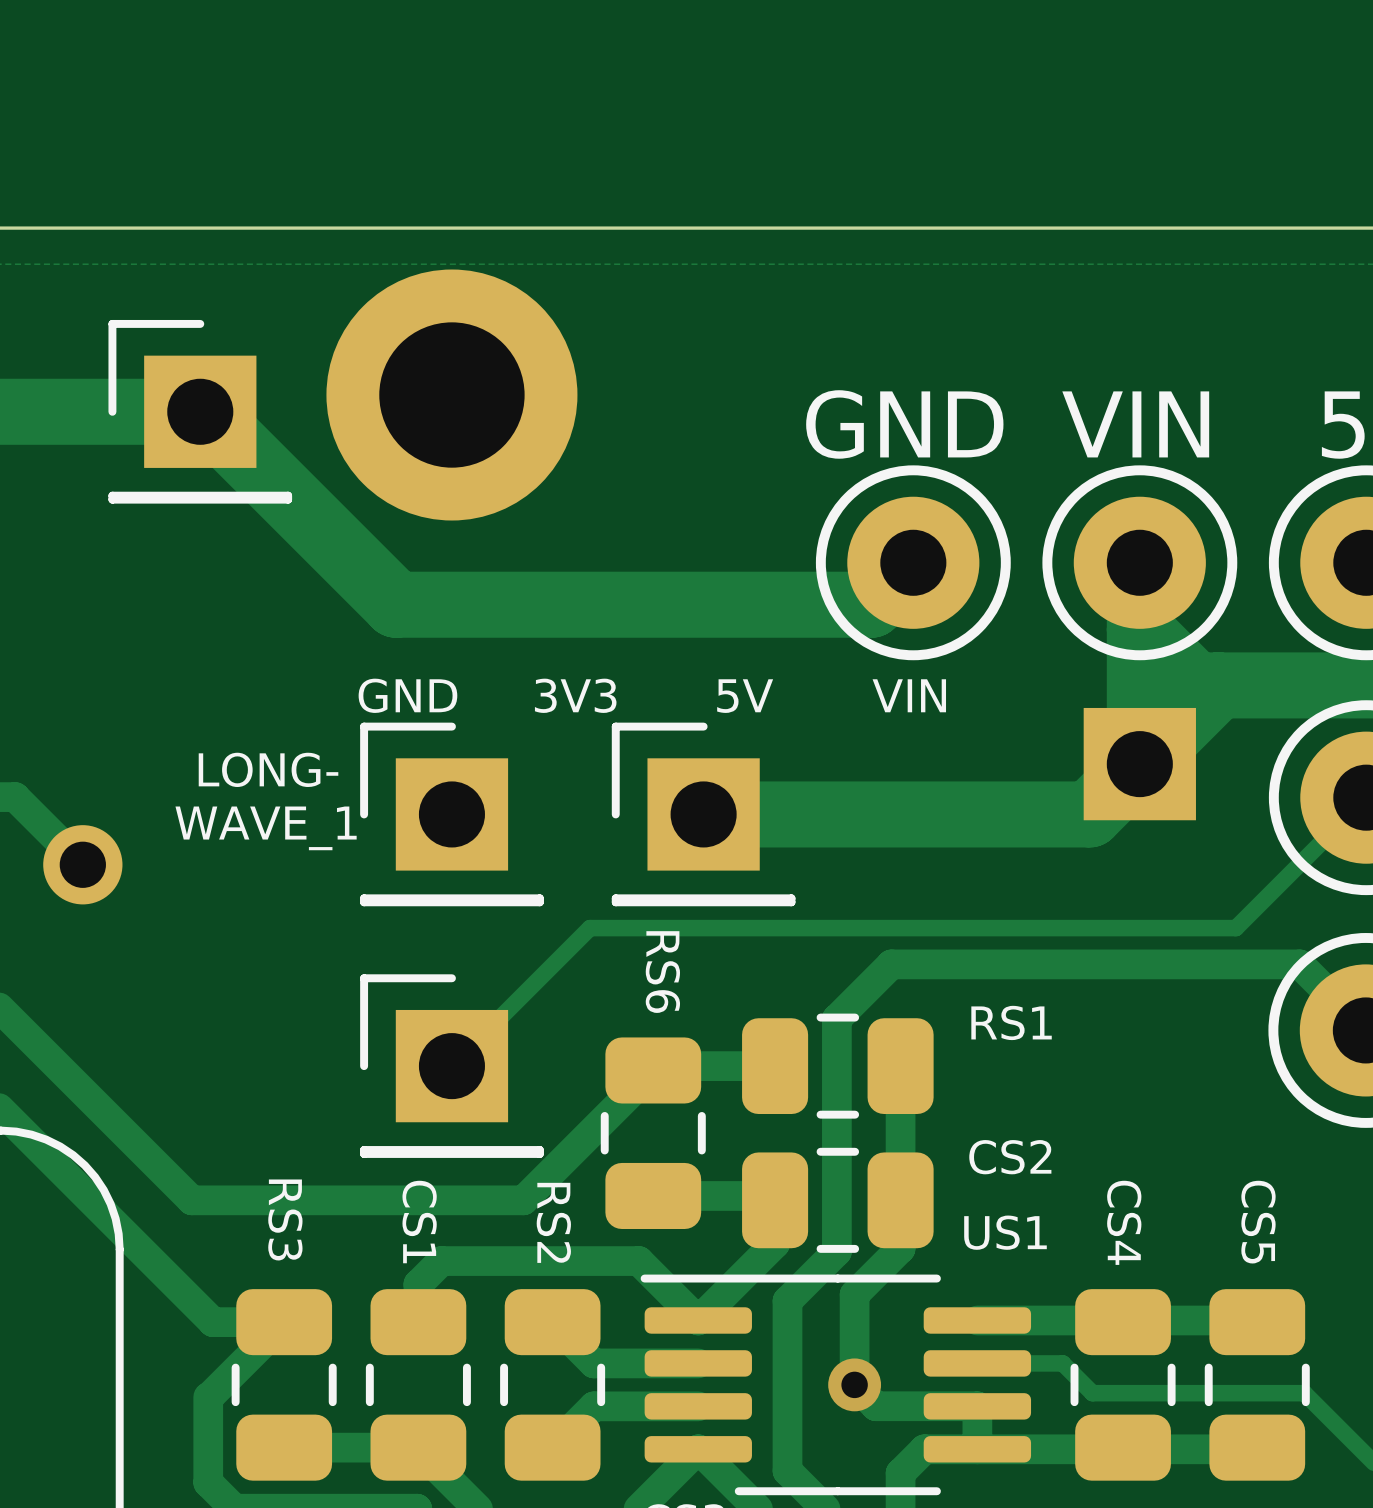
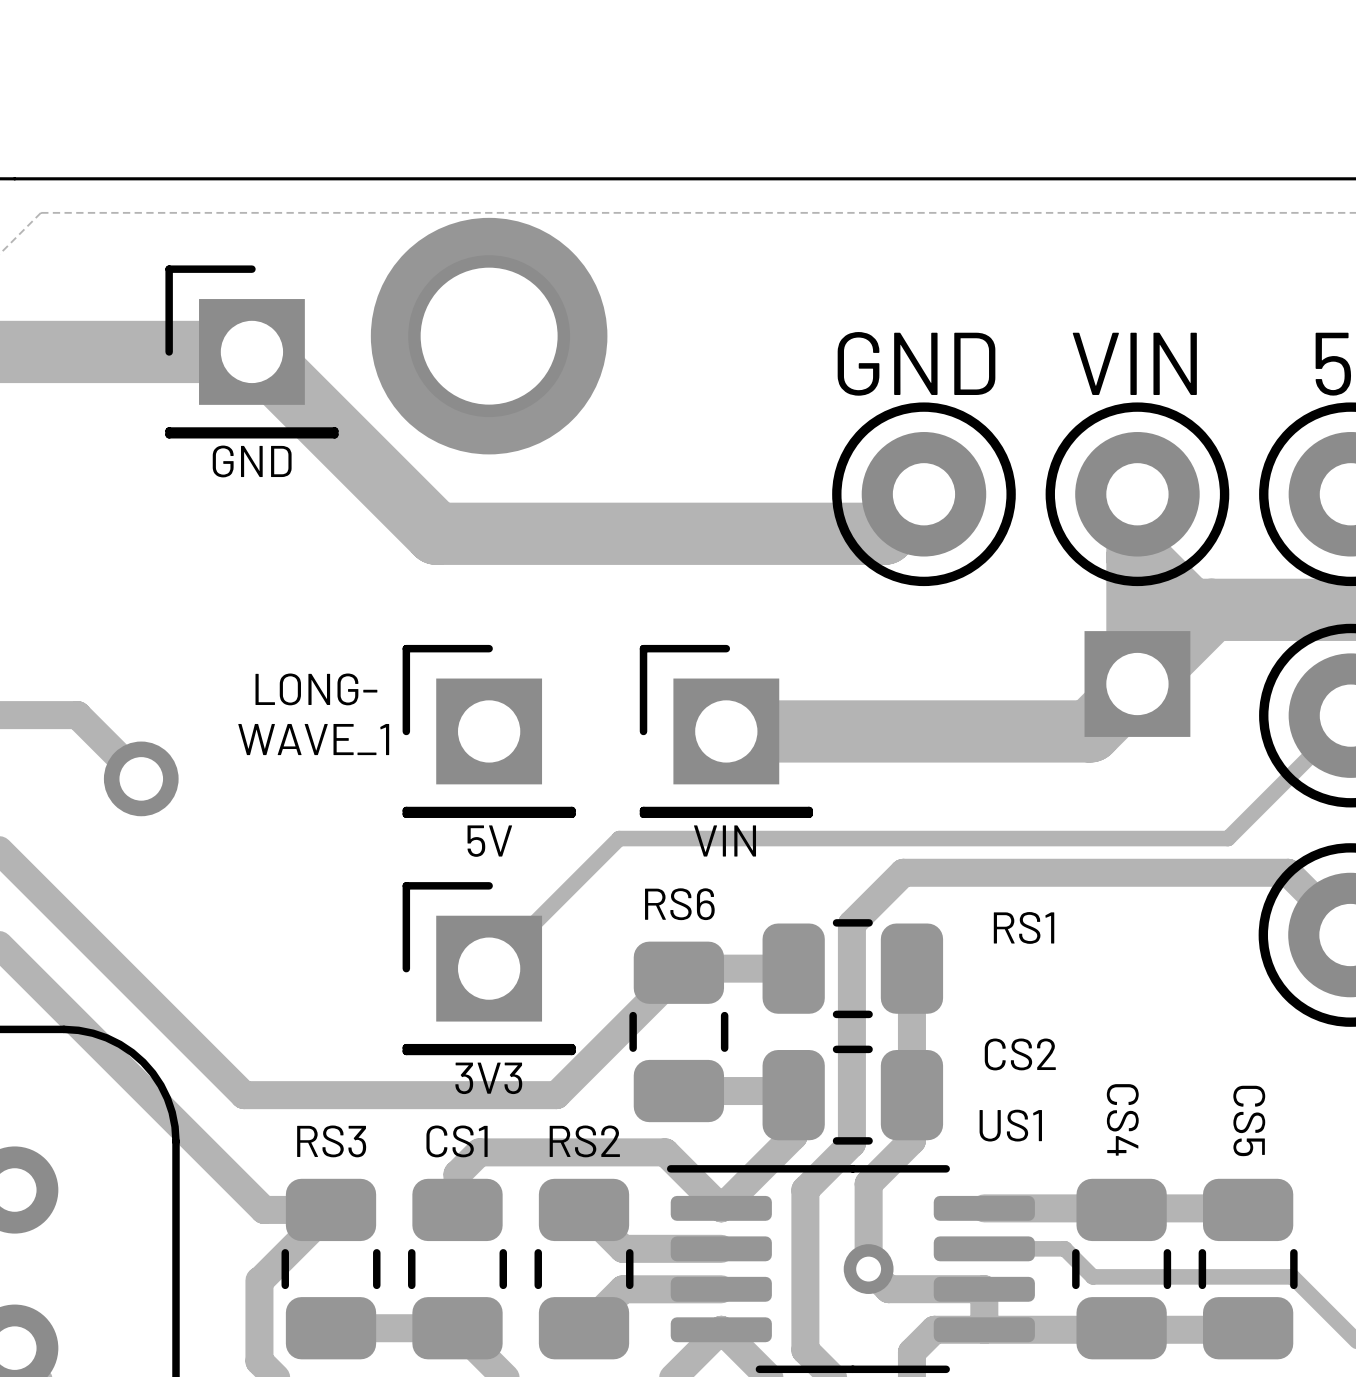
text position: GND (407, 695) -> GND (252, 461)
text position: 3V3 (575, 695) -> 3V3 (488, 1078)
text position: VIN (909, 695) -> VIN (725, 840)
text position: 5V (745, 696) -> 5V (489, 841)
RS6 name rotation: 0° (662, 972) -> 90° counterclockwise (679, 904)
RS3 name rotation: 0° (285, 1219) -> 90° counterclockwise (331, 1141)
CS1 name rotation: 0° (419, 1222) -> 90° counterclockwise (457, 1141)
RS2 name rotation: 0° (553, 1222) -> 90° counterclockwise (584, 1141)

